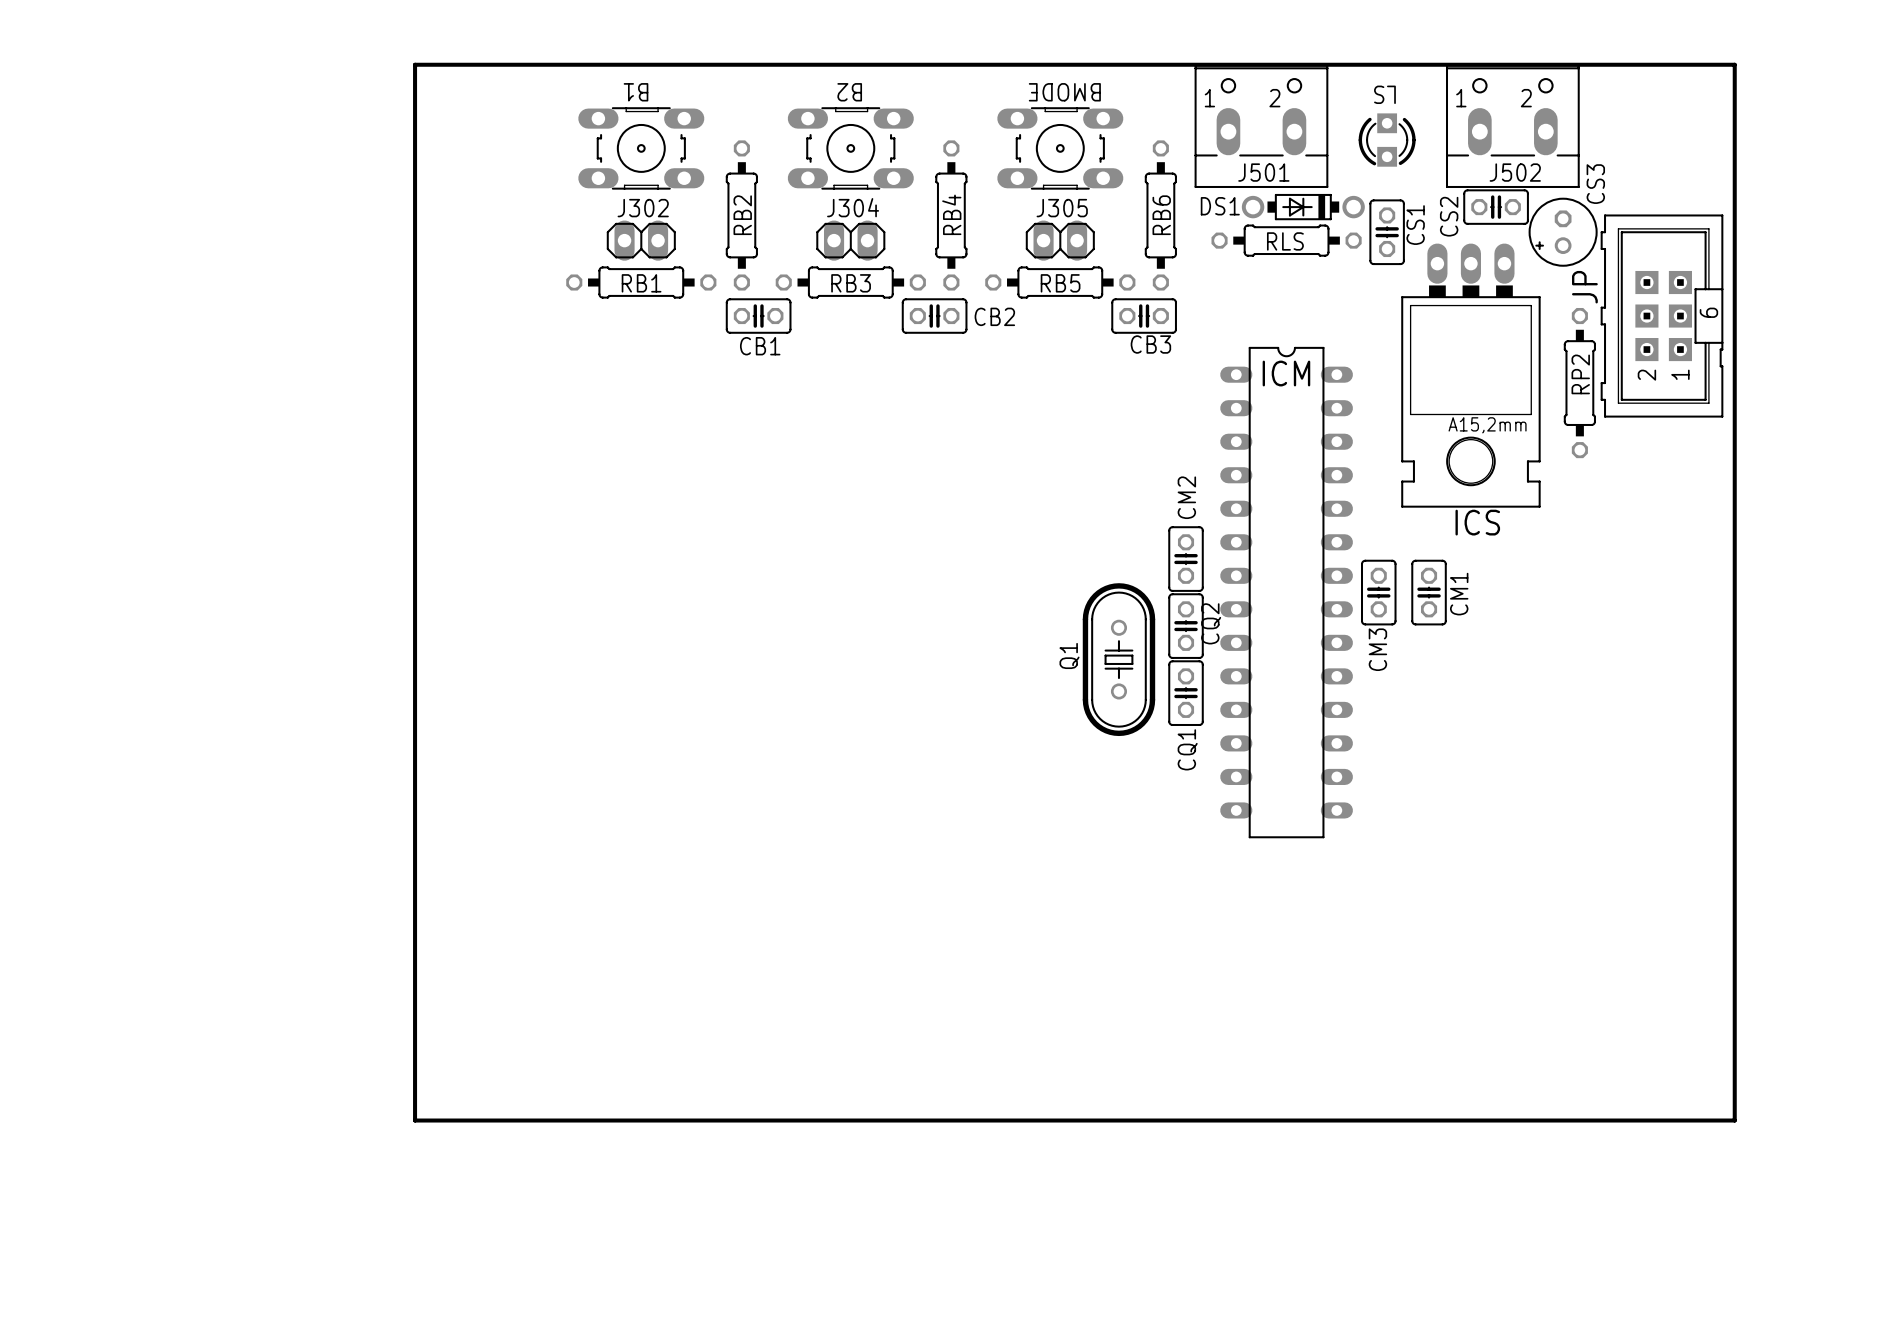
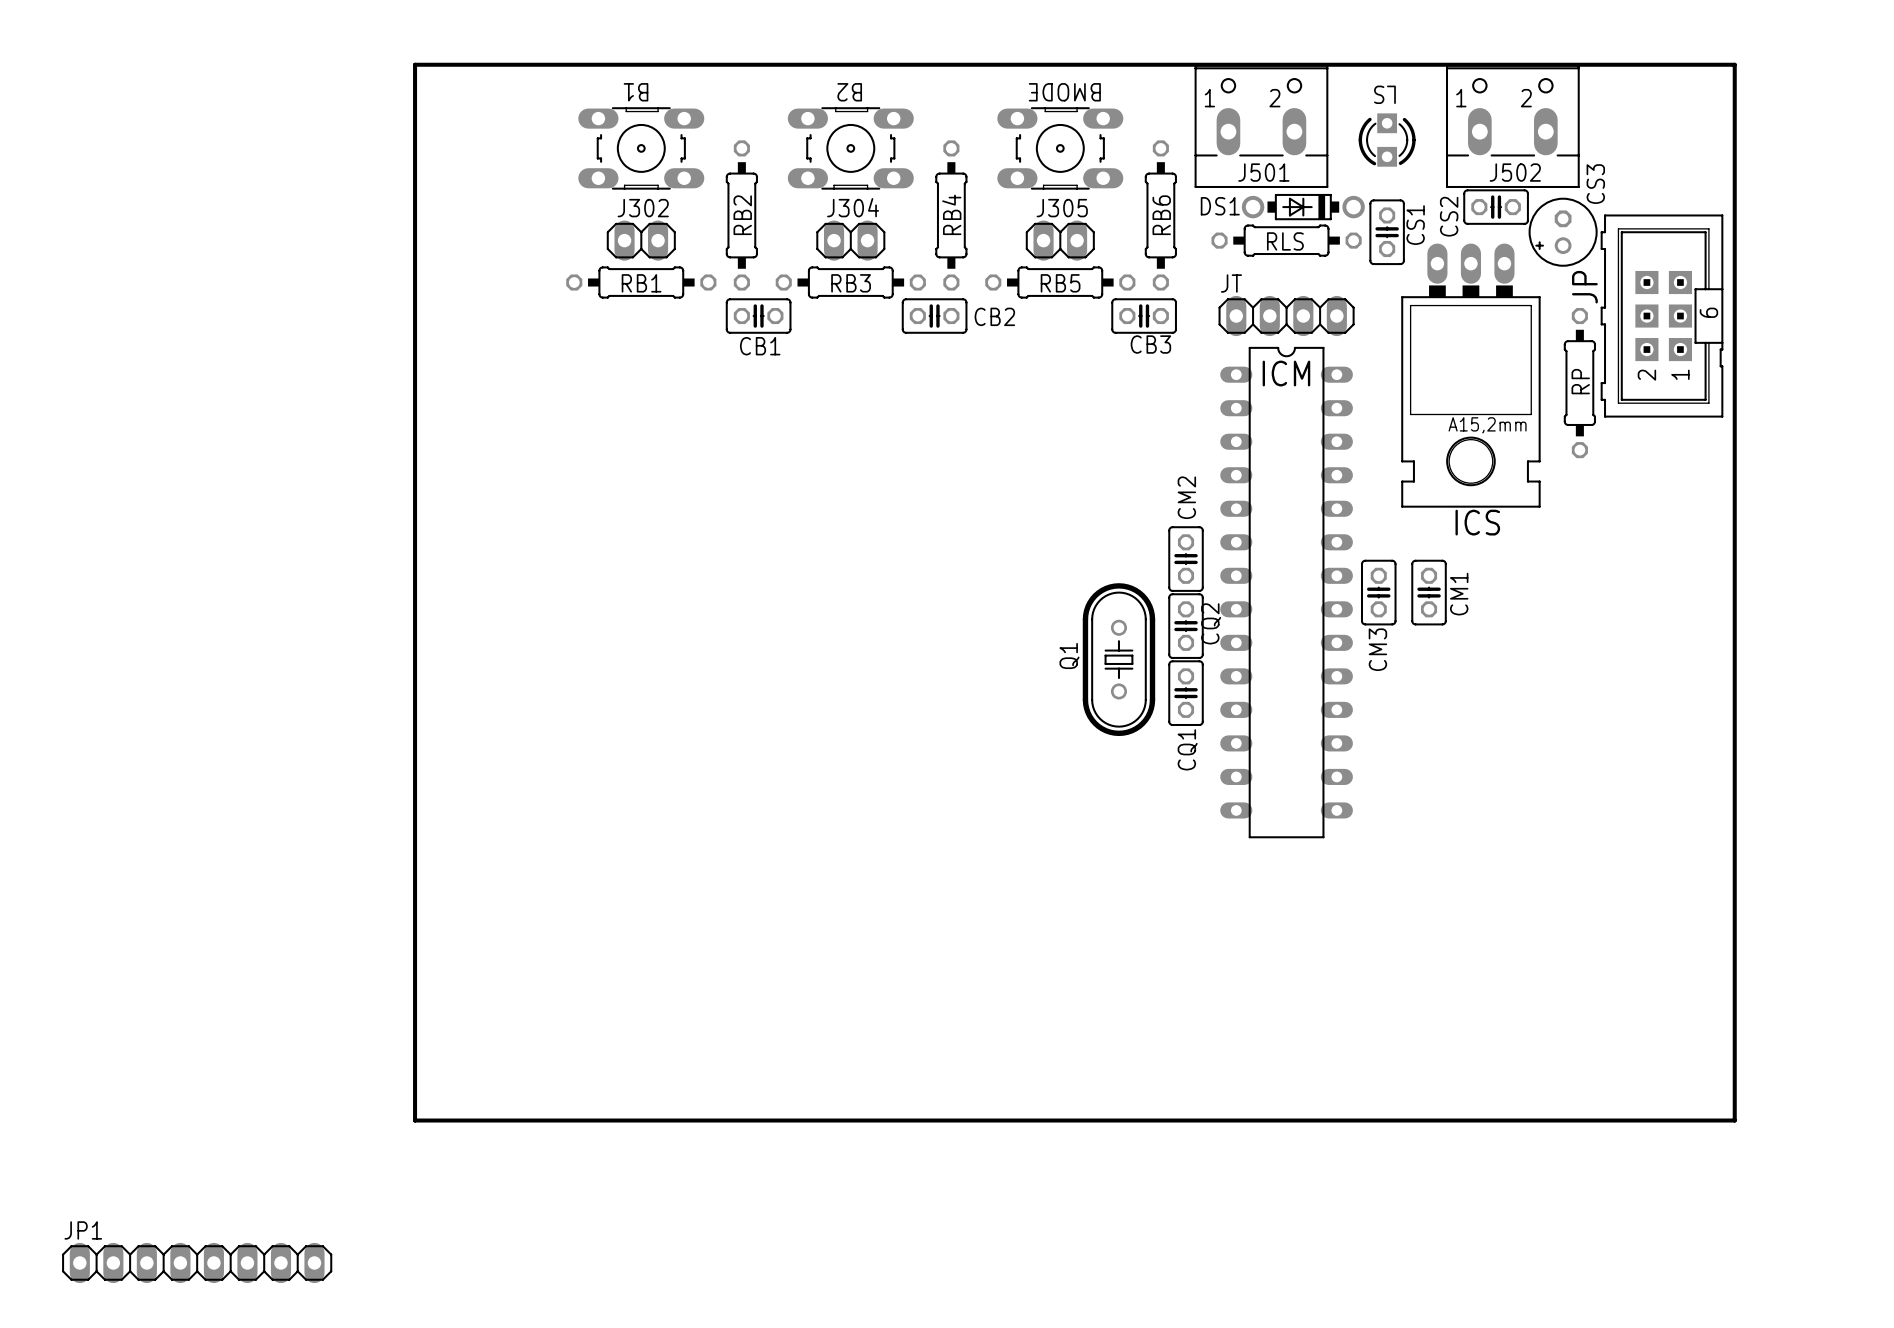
JT: none -> (1286, 316)
RP2 name: RP2 (1580, 374) -> RP (1580, 381)
JP1: none -> (197, 1262)

